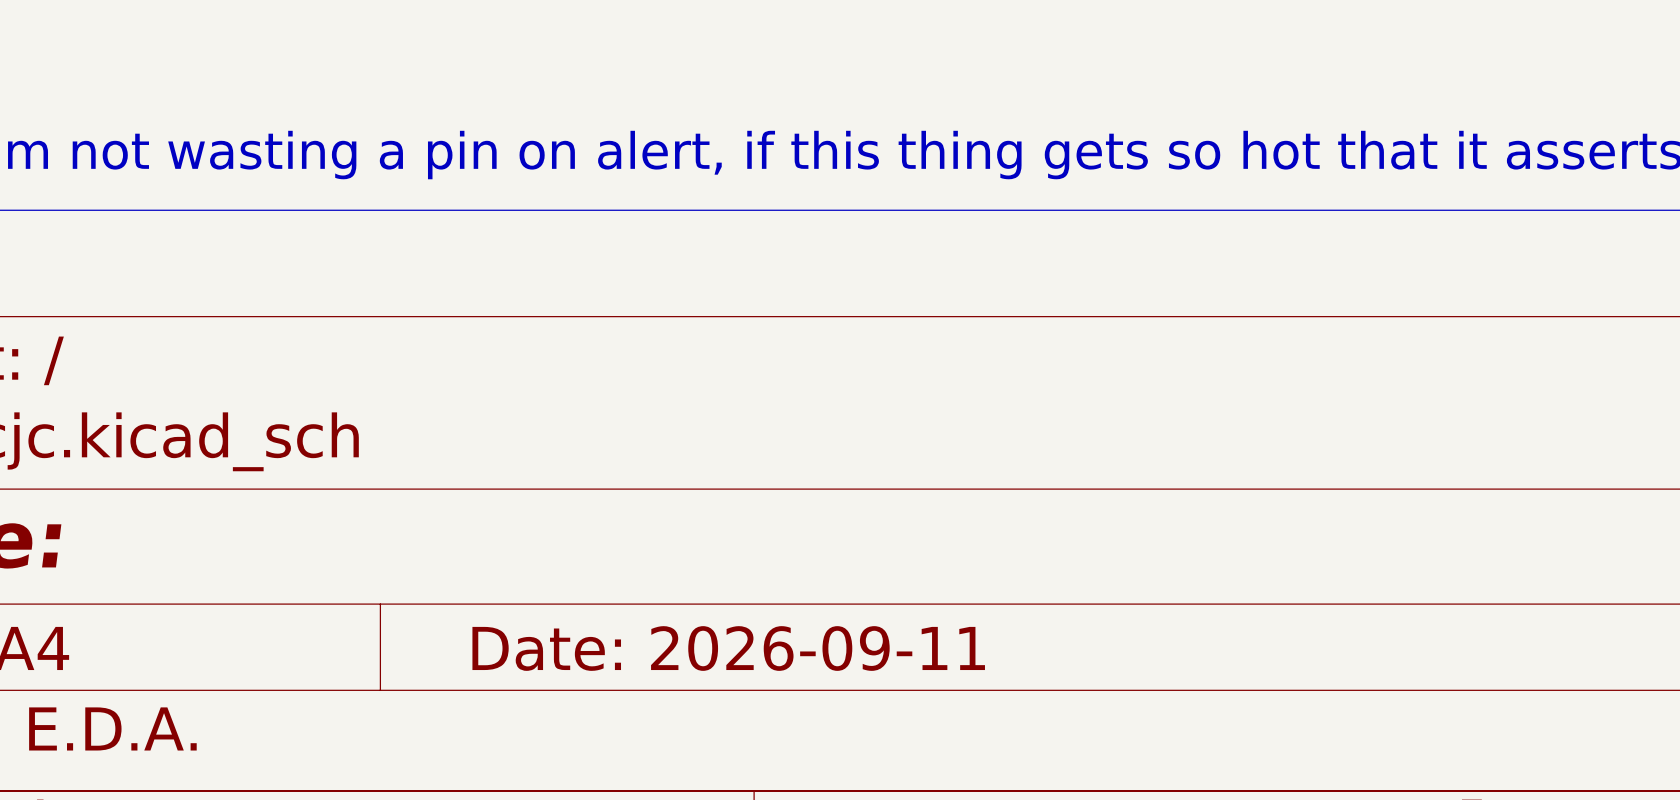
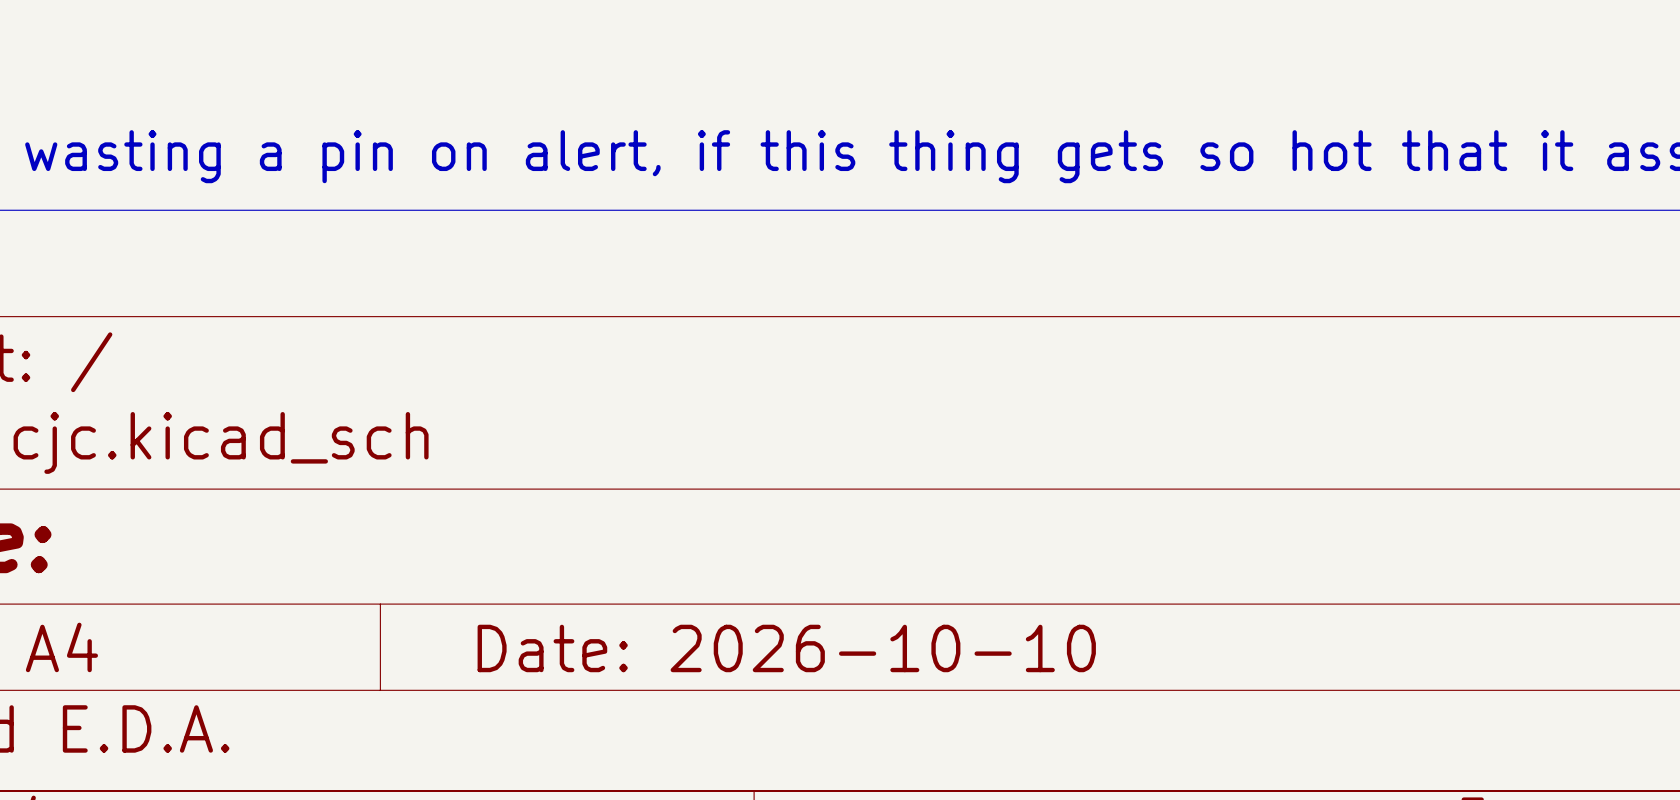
title block: Date: 2026-09-11 (728, 648) -> Date: 2026-10-10 (786, 648)

